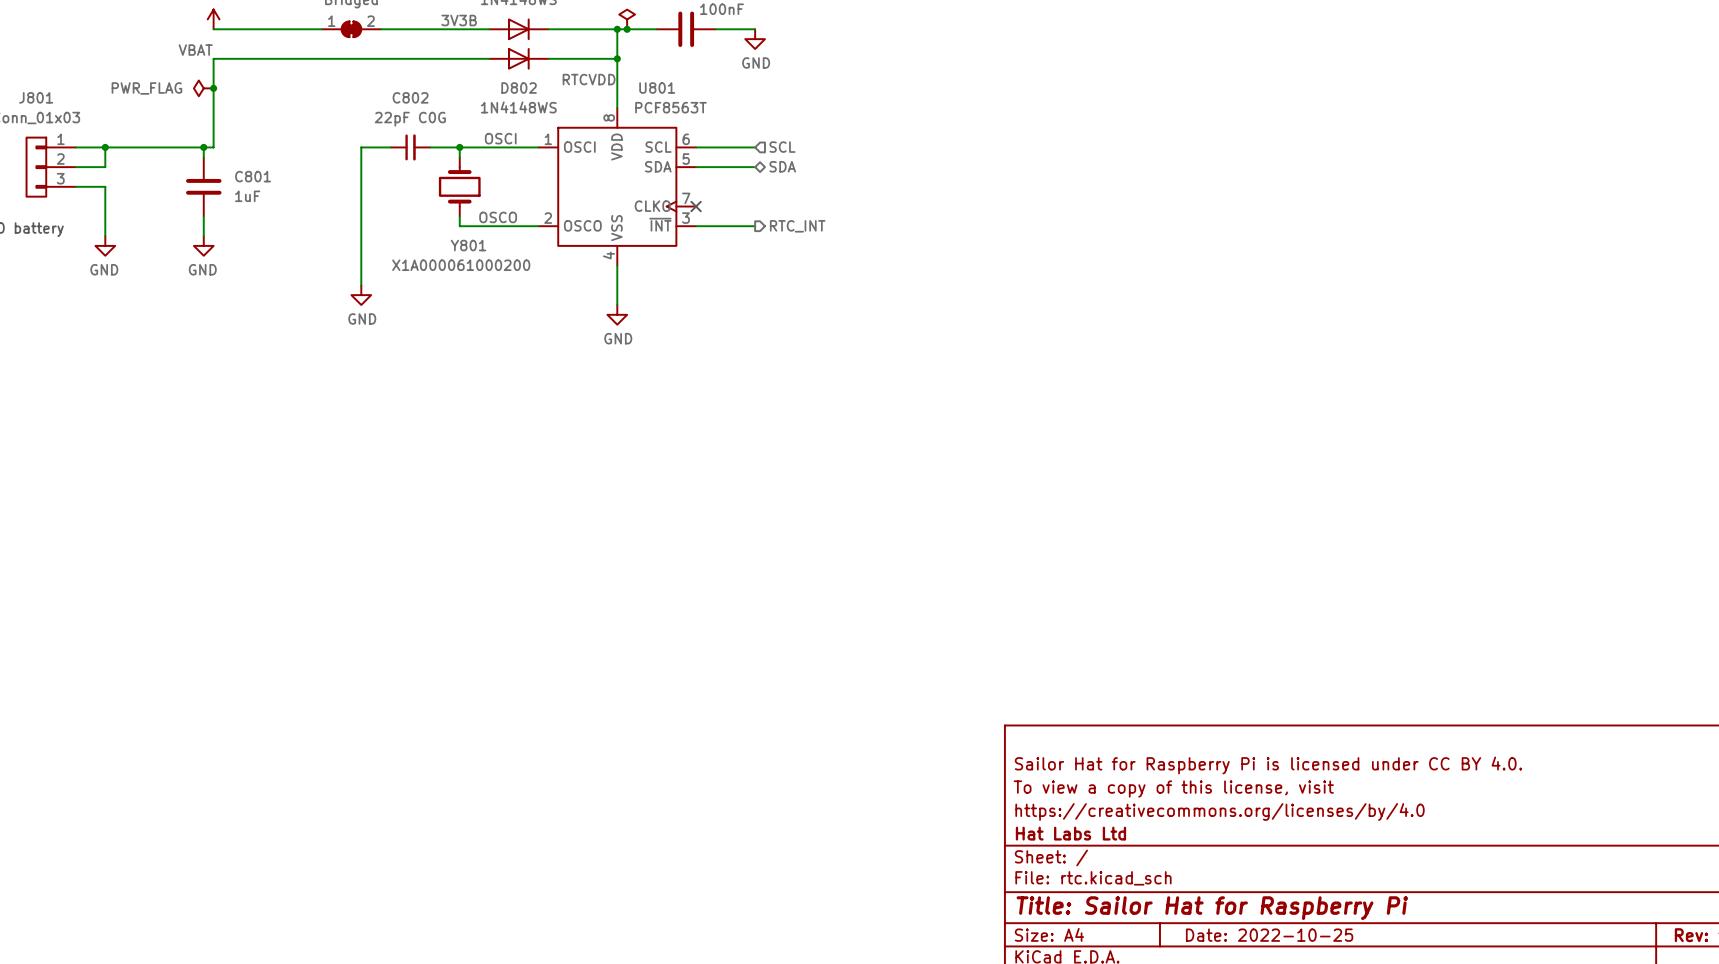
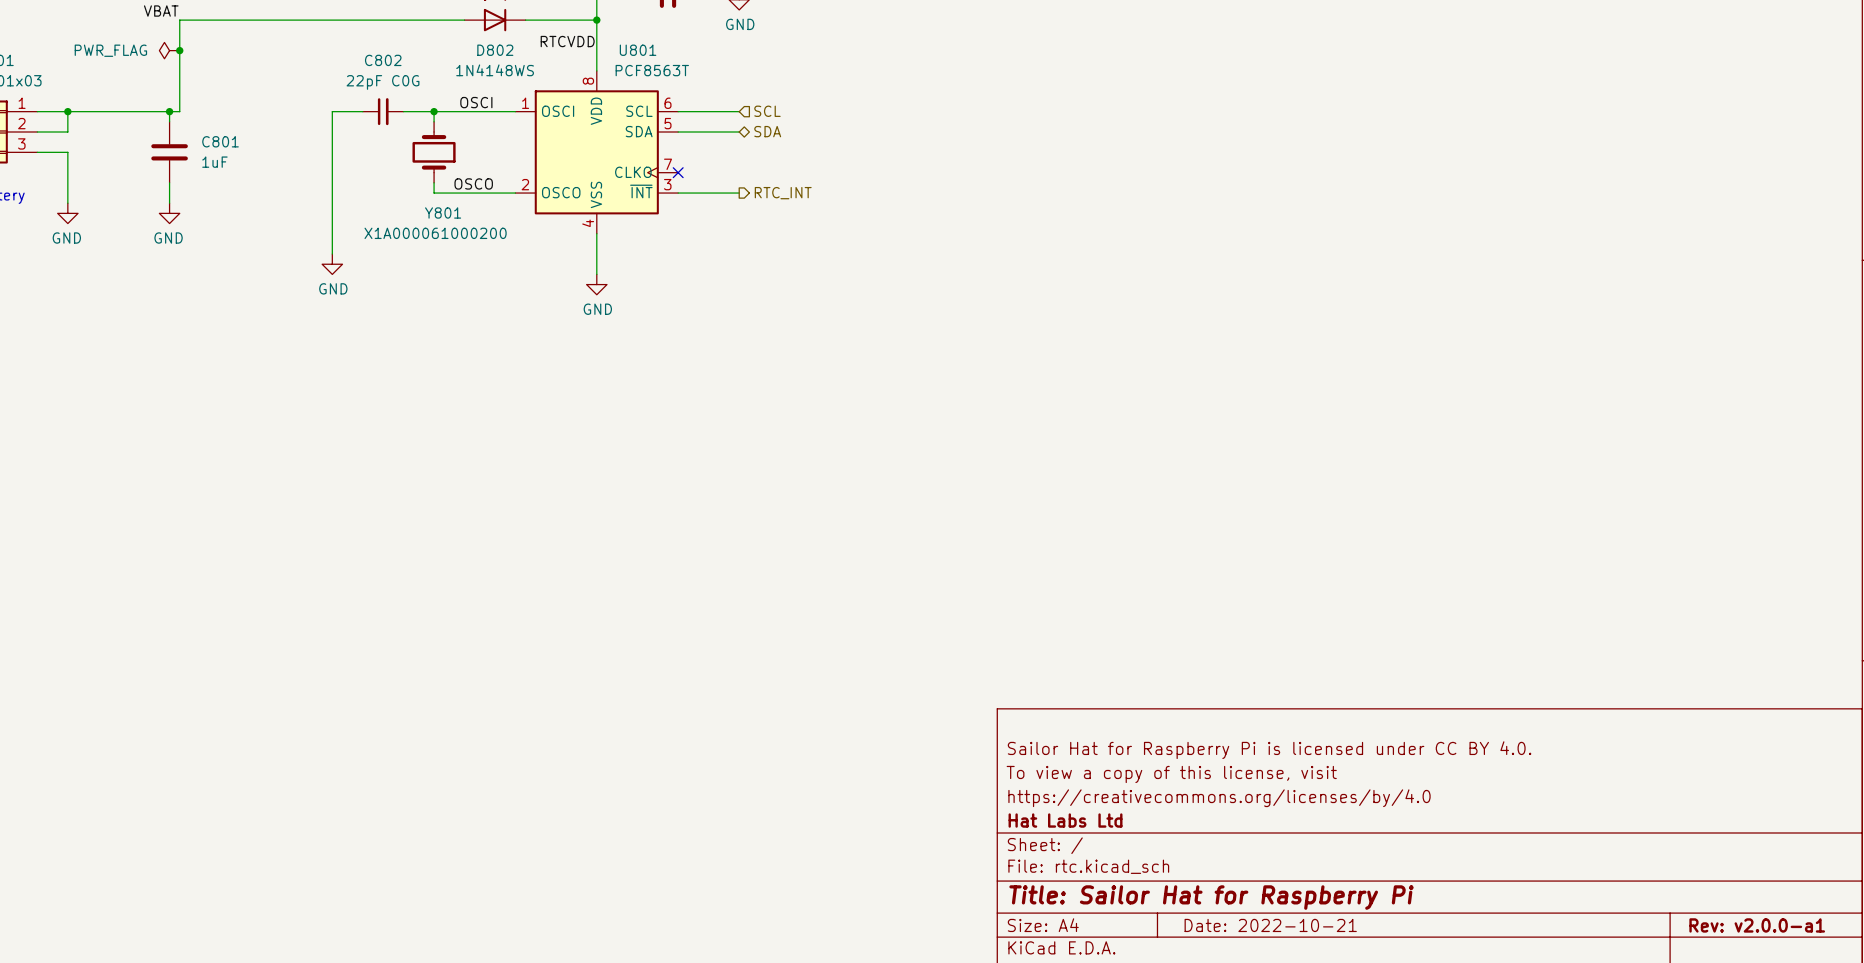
title block: Date: 2022-10-25 (1269, 935) -> Date: 2022-10-21 (1270, 925)

